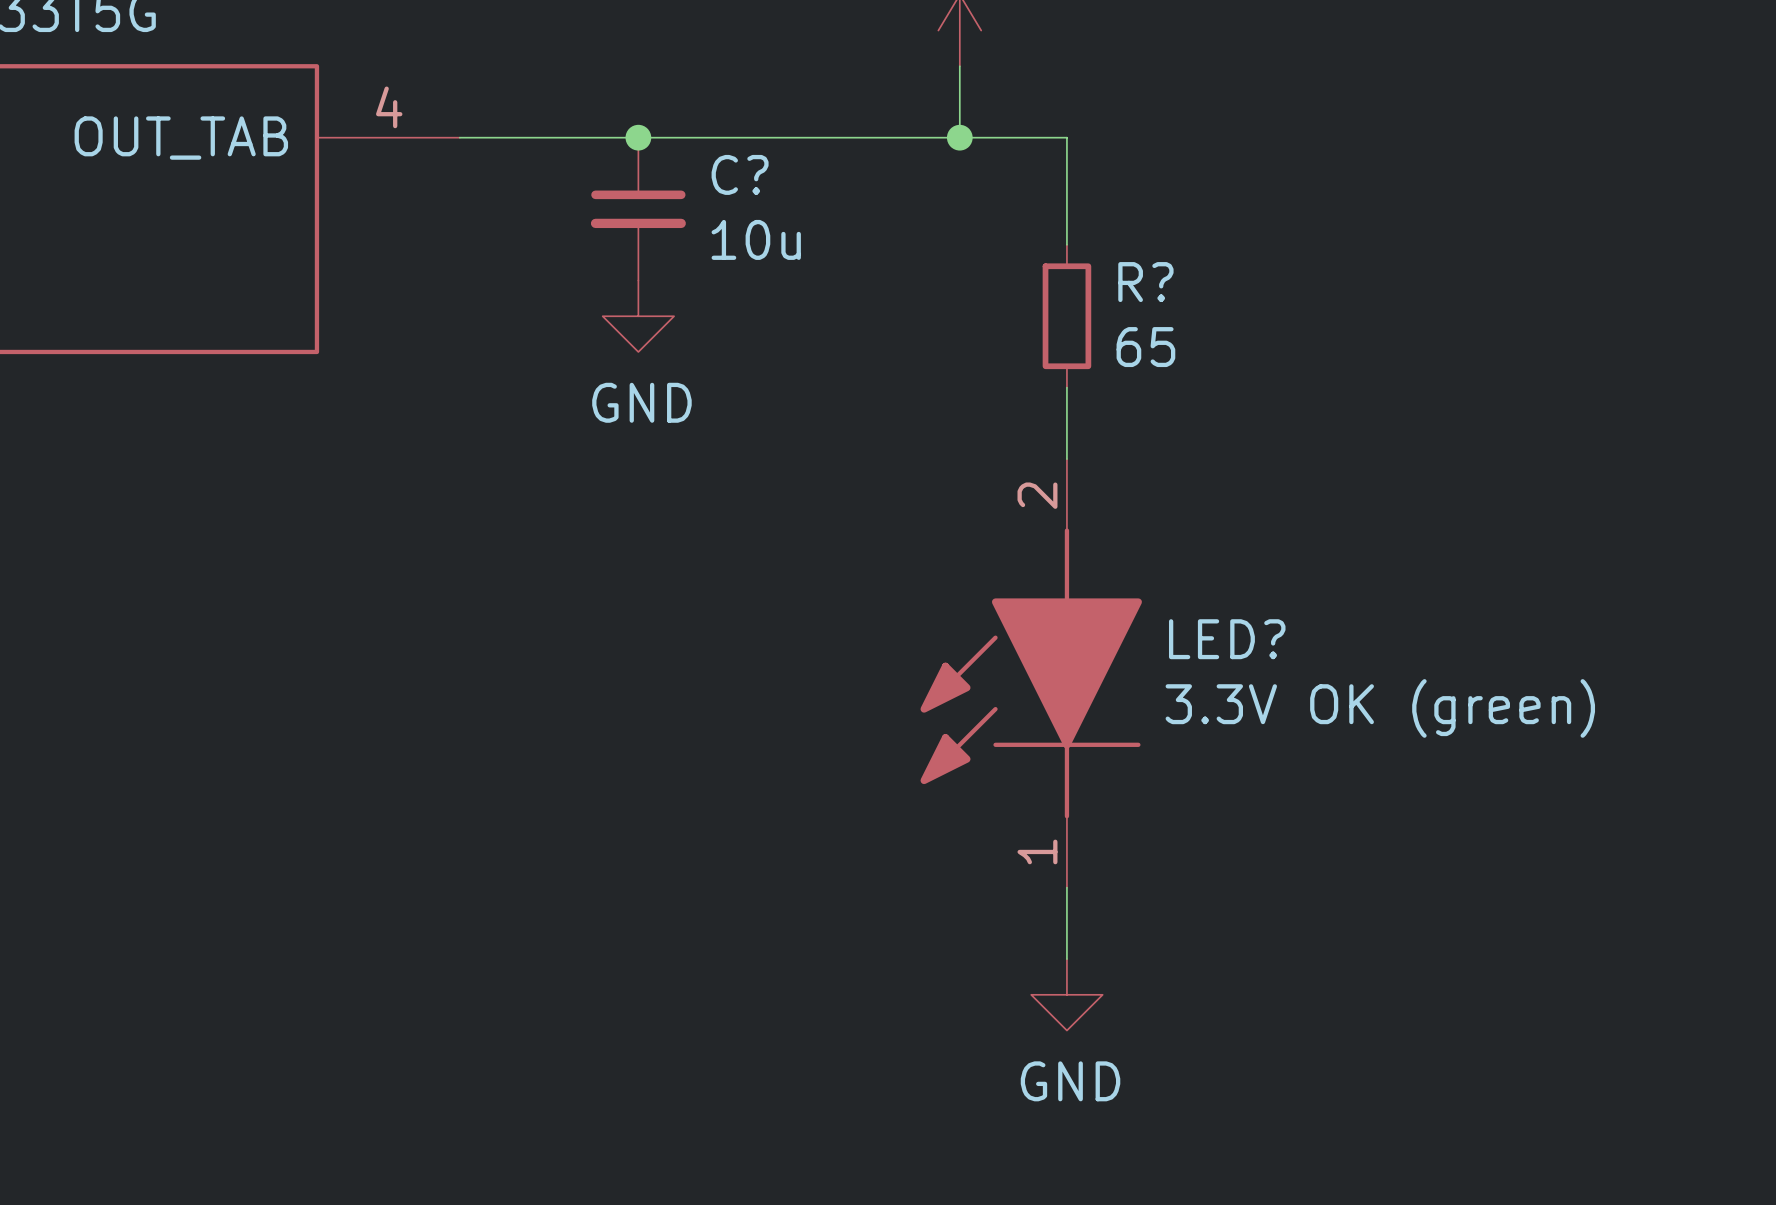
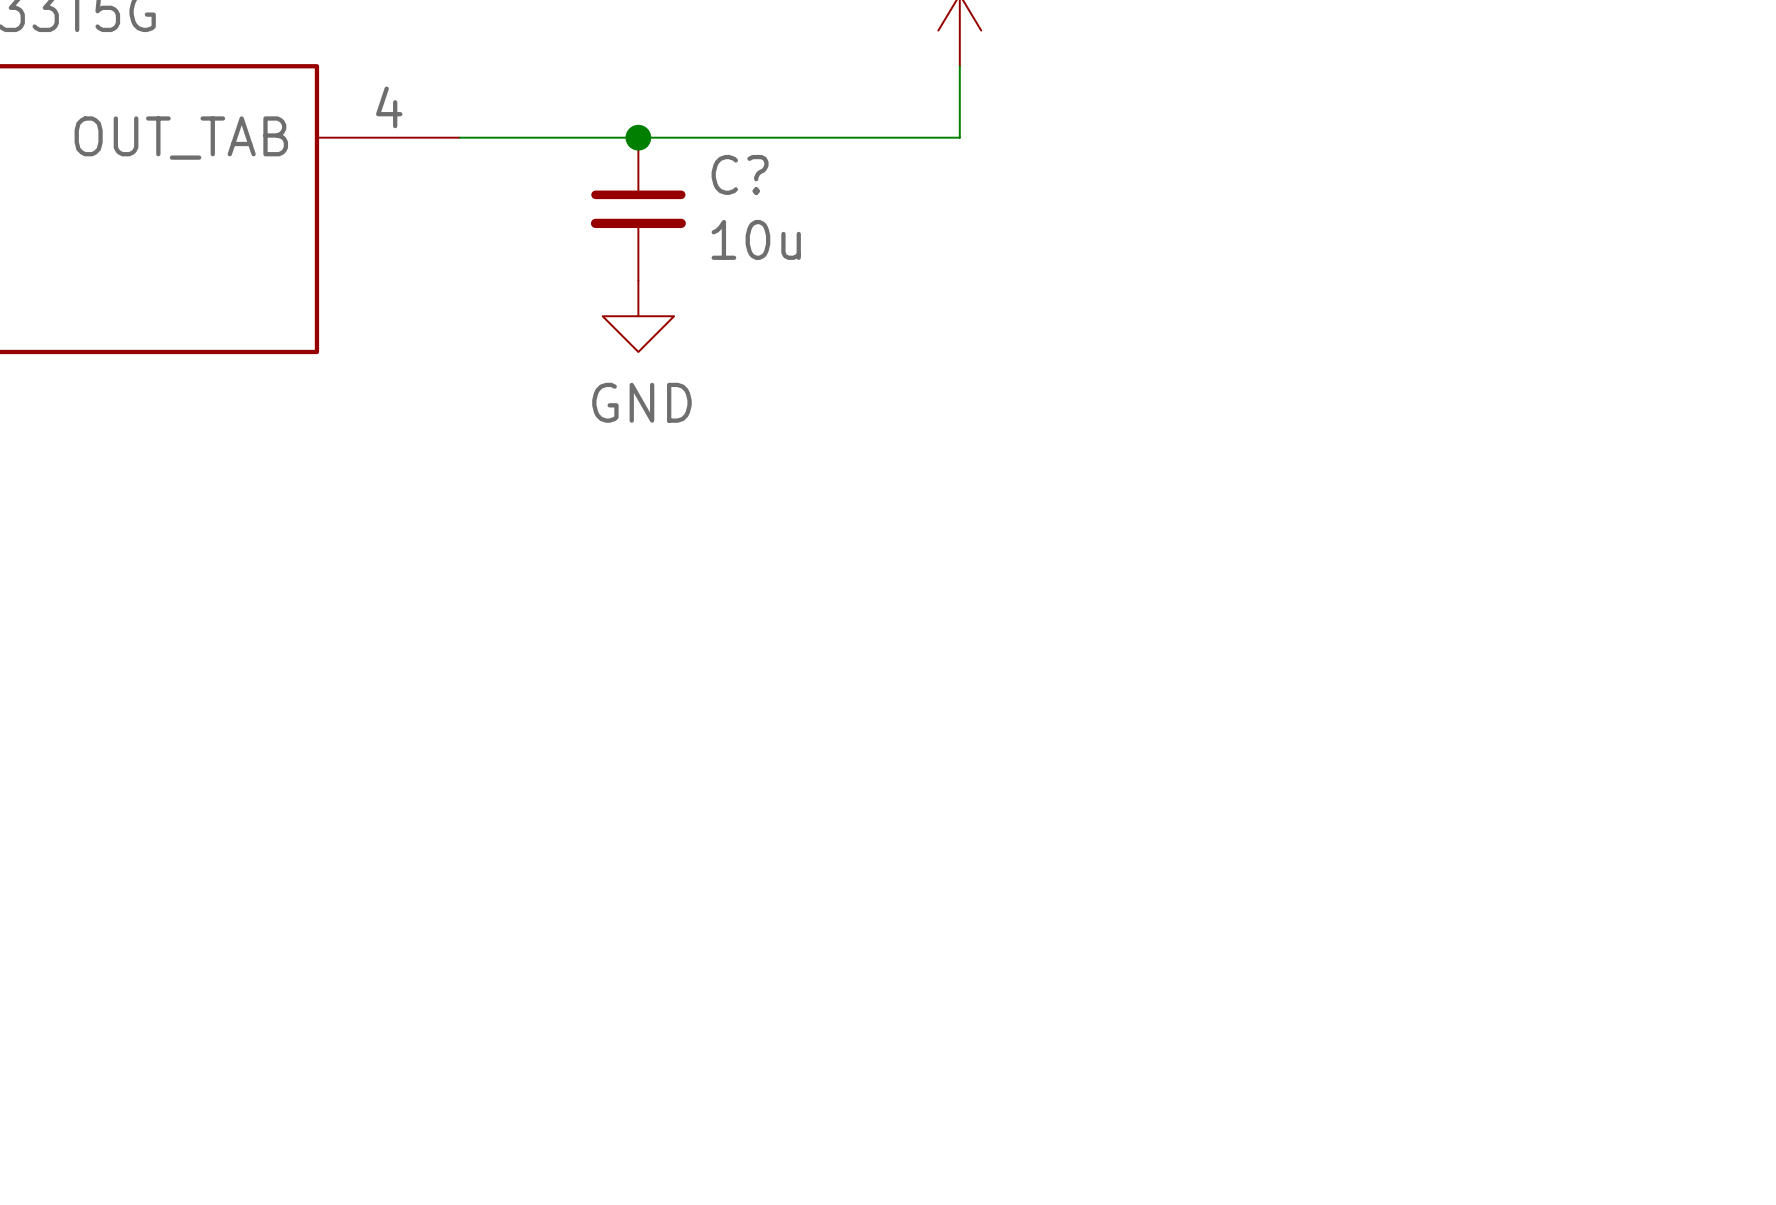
wire: (959, 137) (1066, 137) (1066, 244) -> none
junction: (959, 137) -> none
R?: 65 (1066, 316) -> none
wire: (1066, 387) (1066, 459) -> none
LED?: 3.3V OK (green) (1031, 673) -> none
wire: (1066, 887) (1066, 959) -> none
power symbol: GND (1066, 994) -> none

